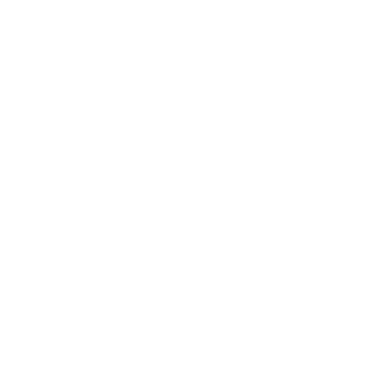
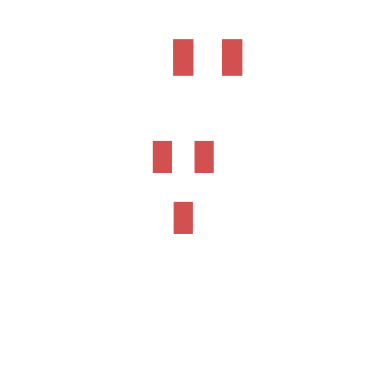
part: none -> (207, 57)
part: none -> (183, 187)

